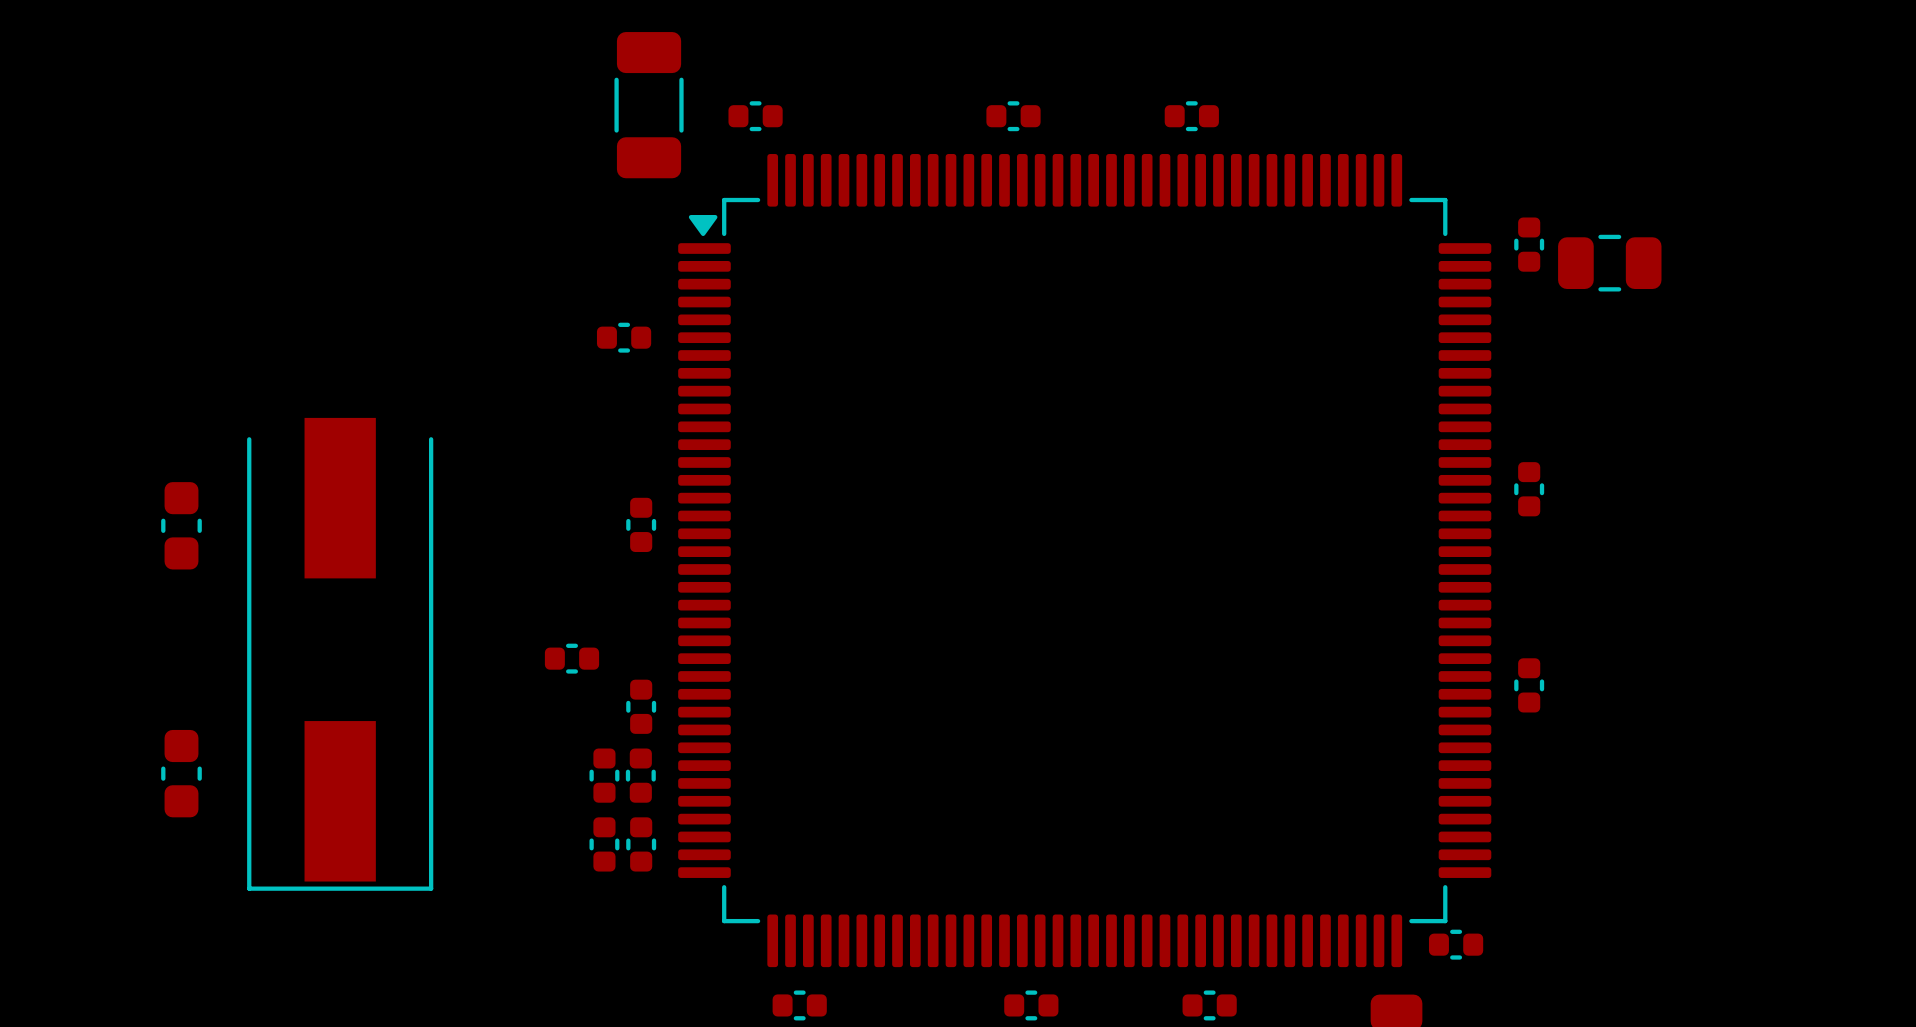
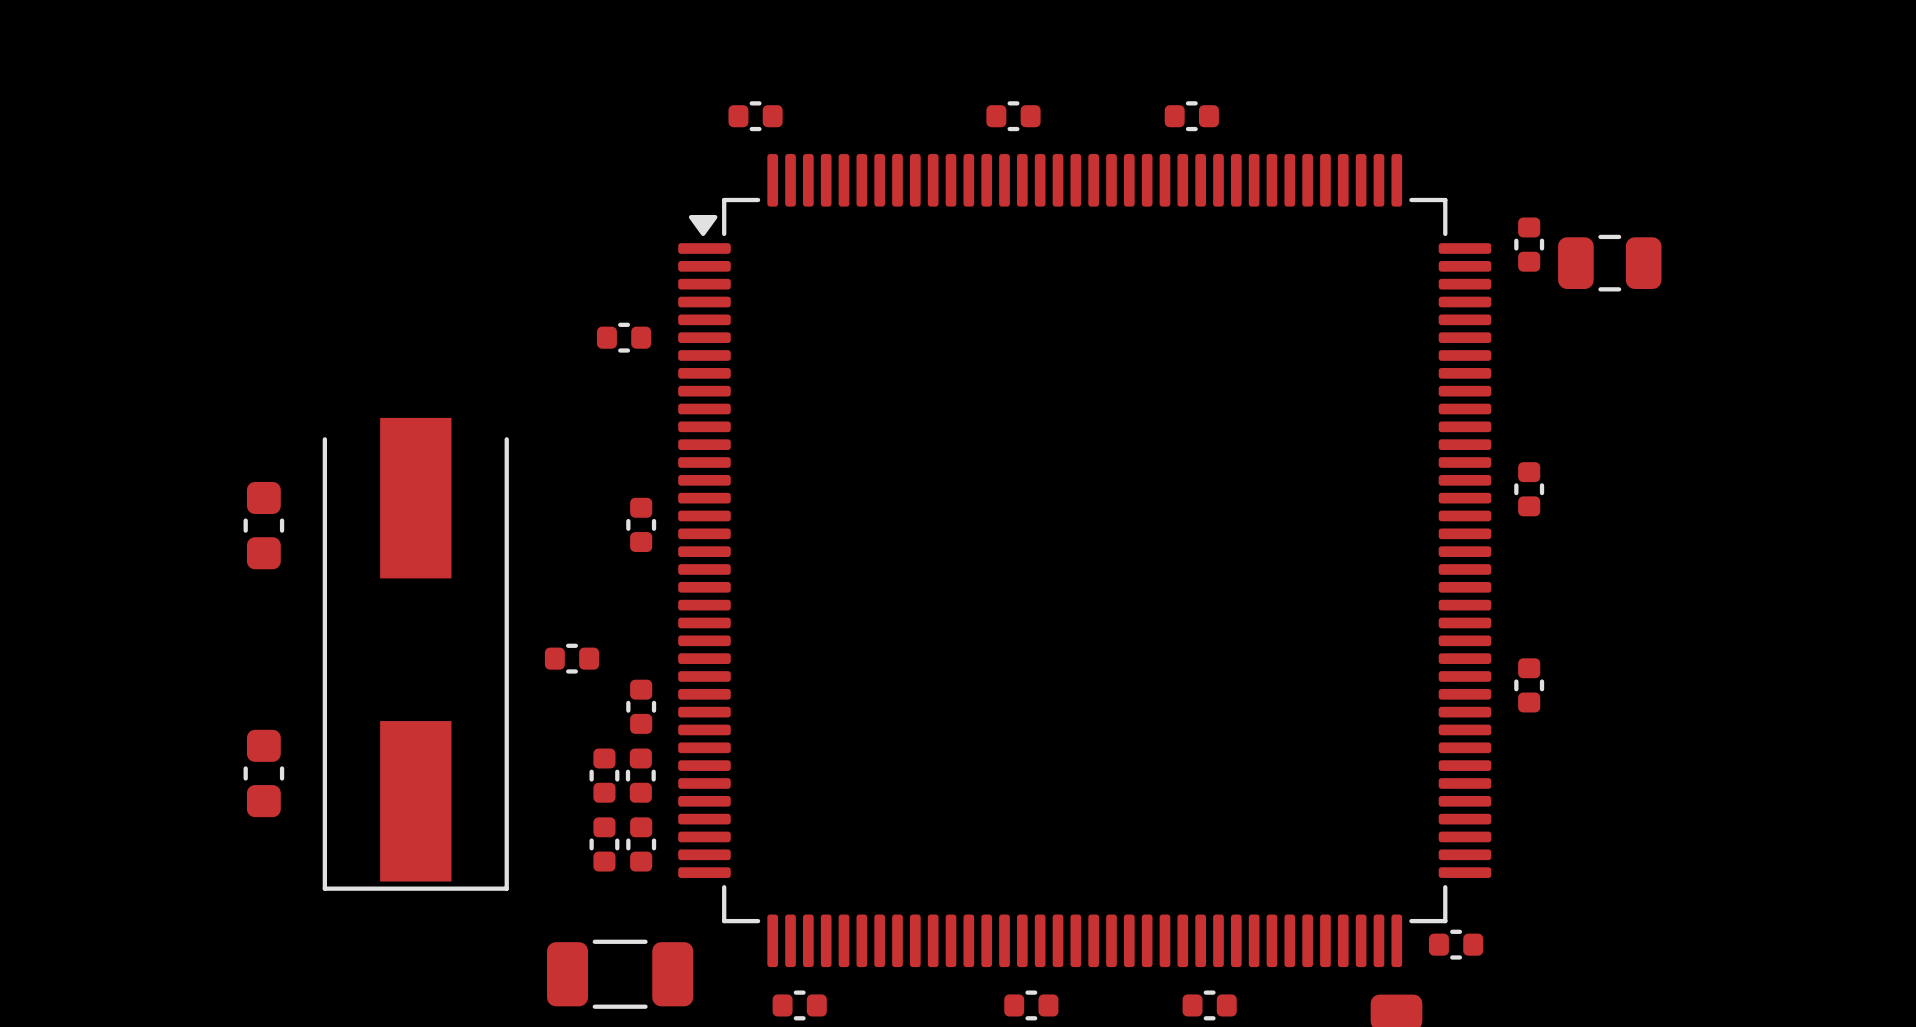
part rotation: 0° (649, 105) -> 90° clockwise (620, 974)
part position: (649, 105) -> (620, 974)
part position: (181, 525) -> (263, 525)
part position: (340, 654) -> (415, 654)
part position: (181, 773) -> (263, 773)

